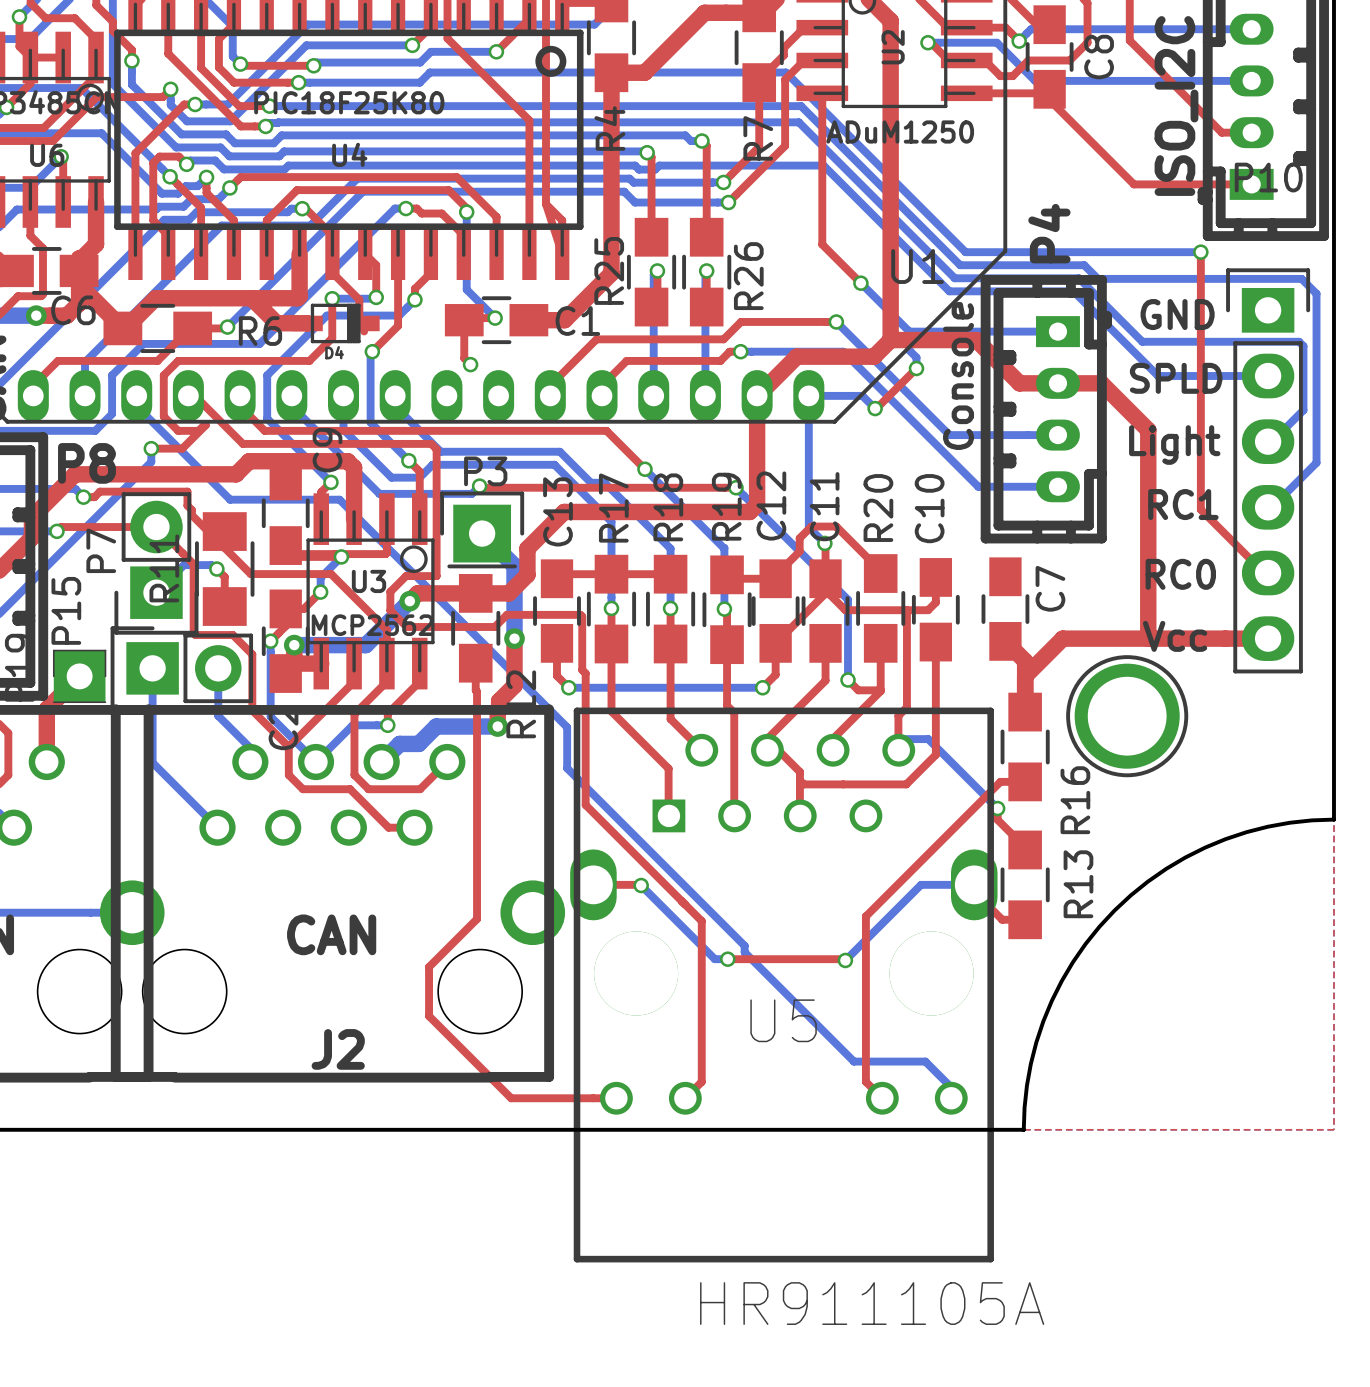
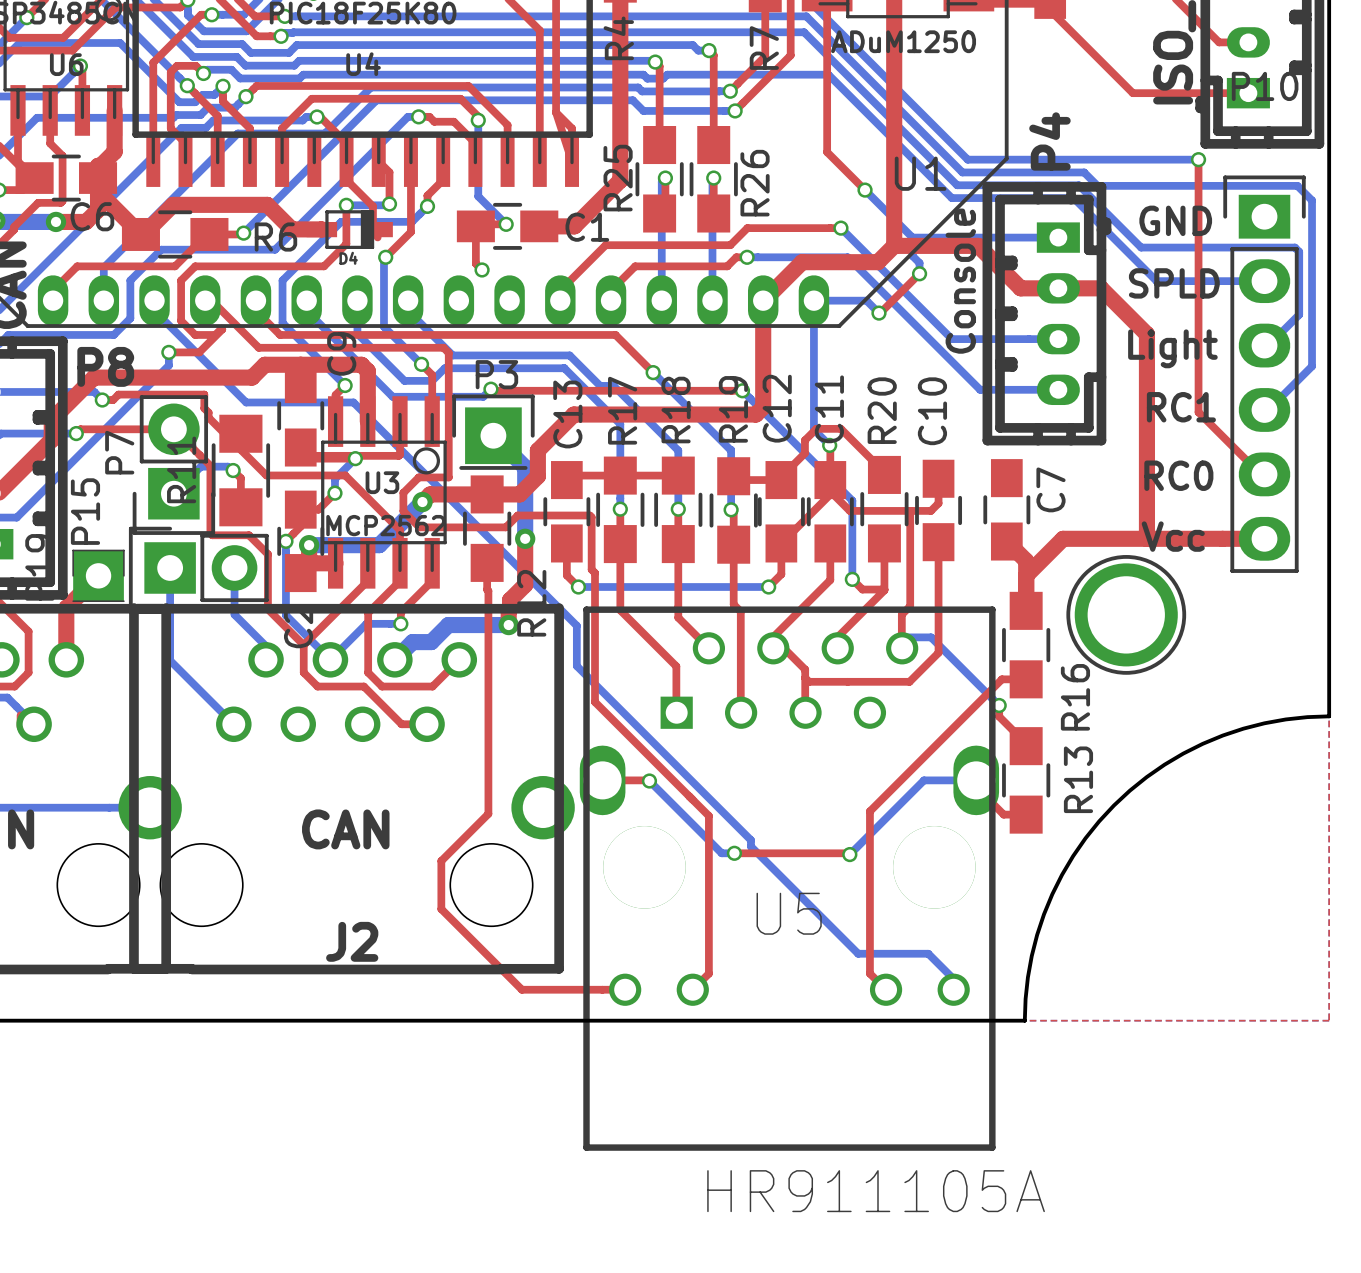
top track: (299, 254) (299, 296) (297, 298) (251, 298) -> none

